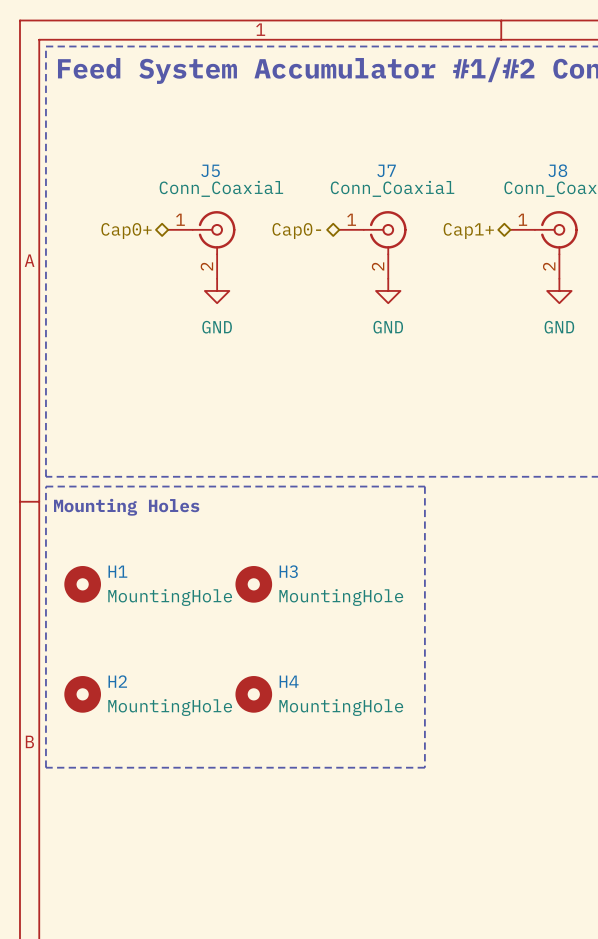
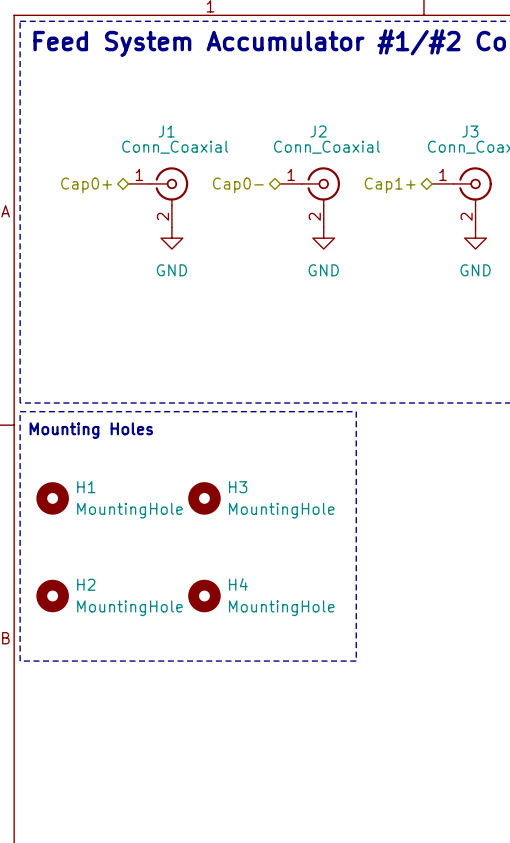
J5 name: J5 (210, 170) -> J1 (166, 131)
J7 name: J7 (386, 170) -> J2 (318, 131)
J8 name: J8 (557, 170) -> J3 (470, 131)

